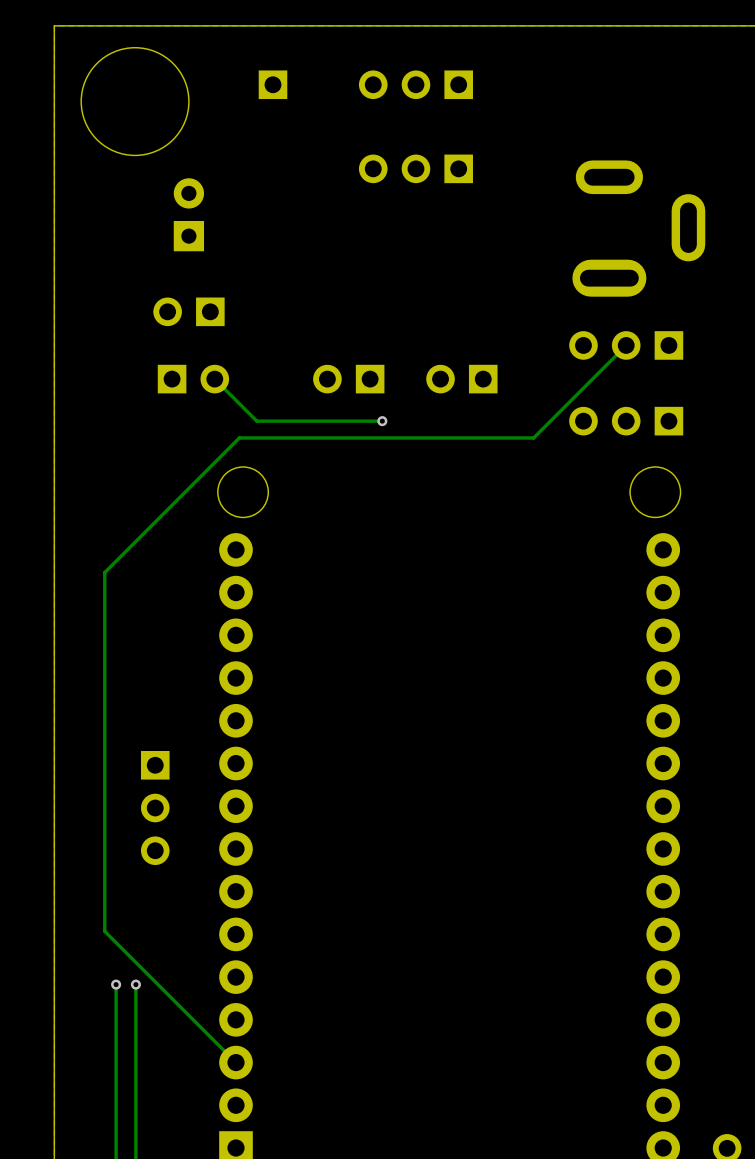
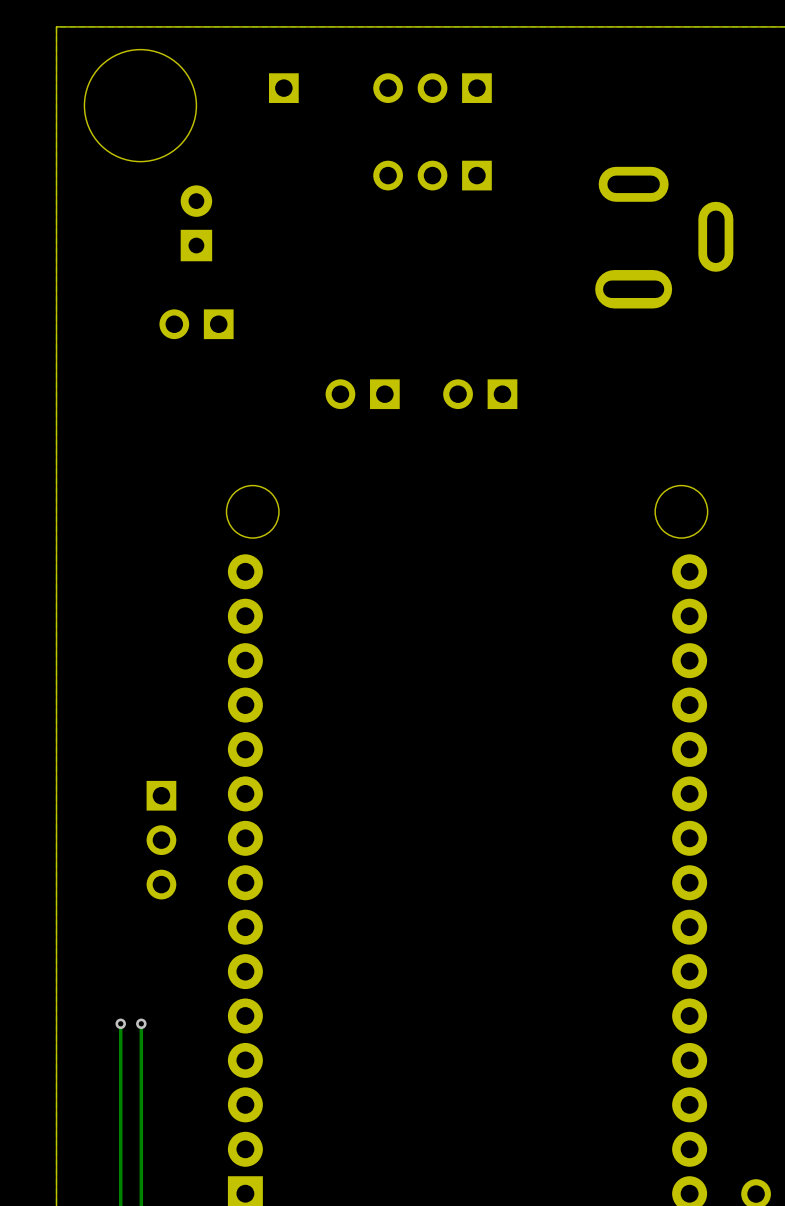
track: (626, 345) (533, 437) (239, 437) (104, 572) (104, 931) (235, 1062) -> none
part: (626, 345) -> none
part: (193, 379) -> none
track: (214, 379) (256, 421) (382, 421) -> none
via: (382, 421) -> none
part: (626, 421) -> none

